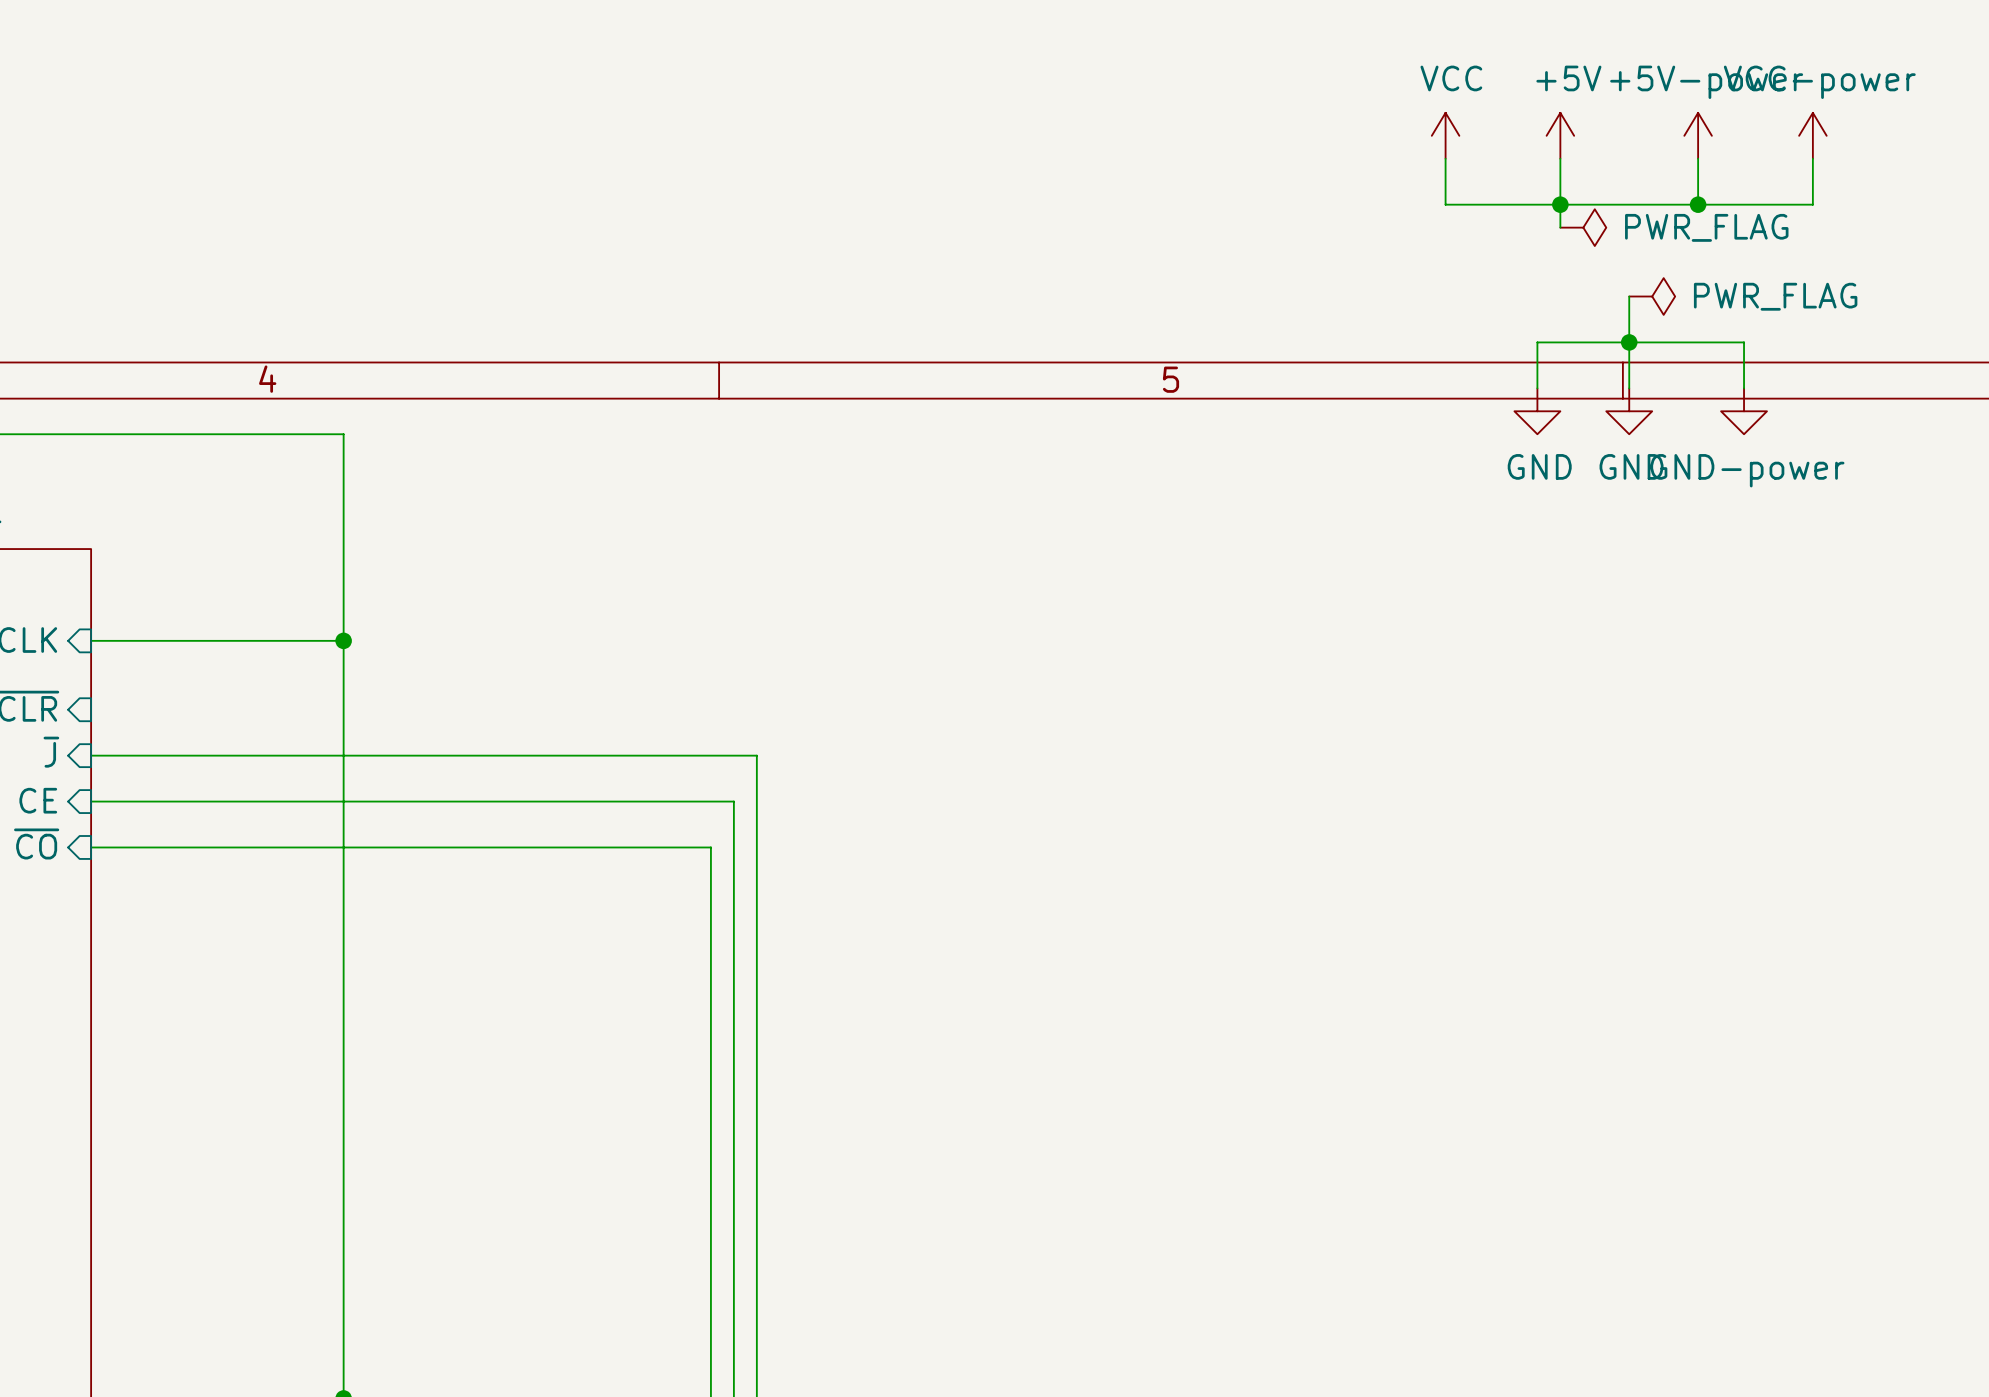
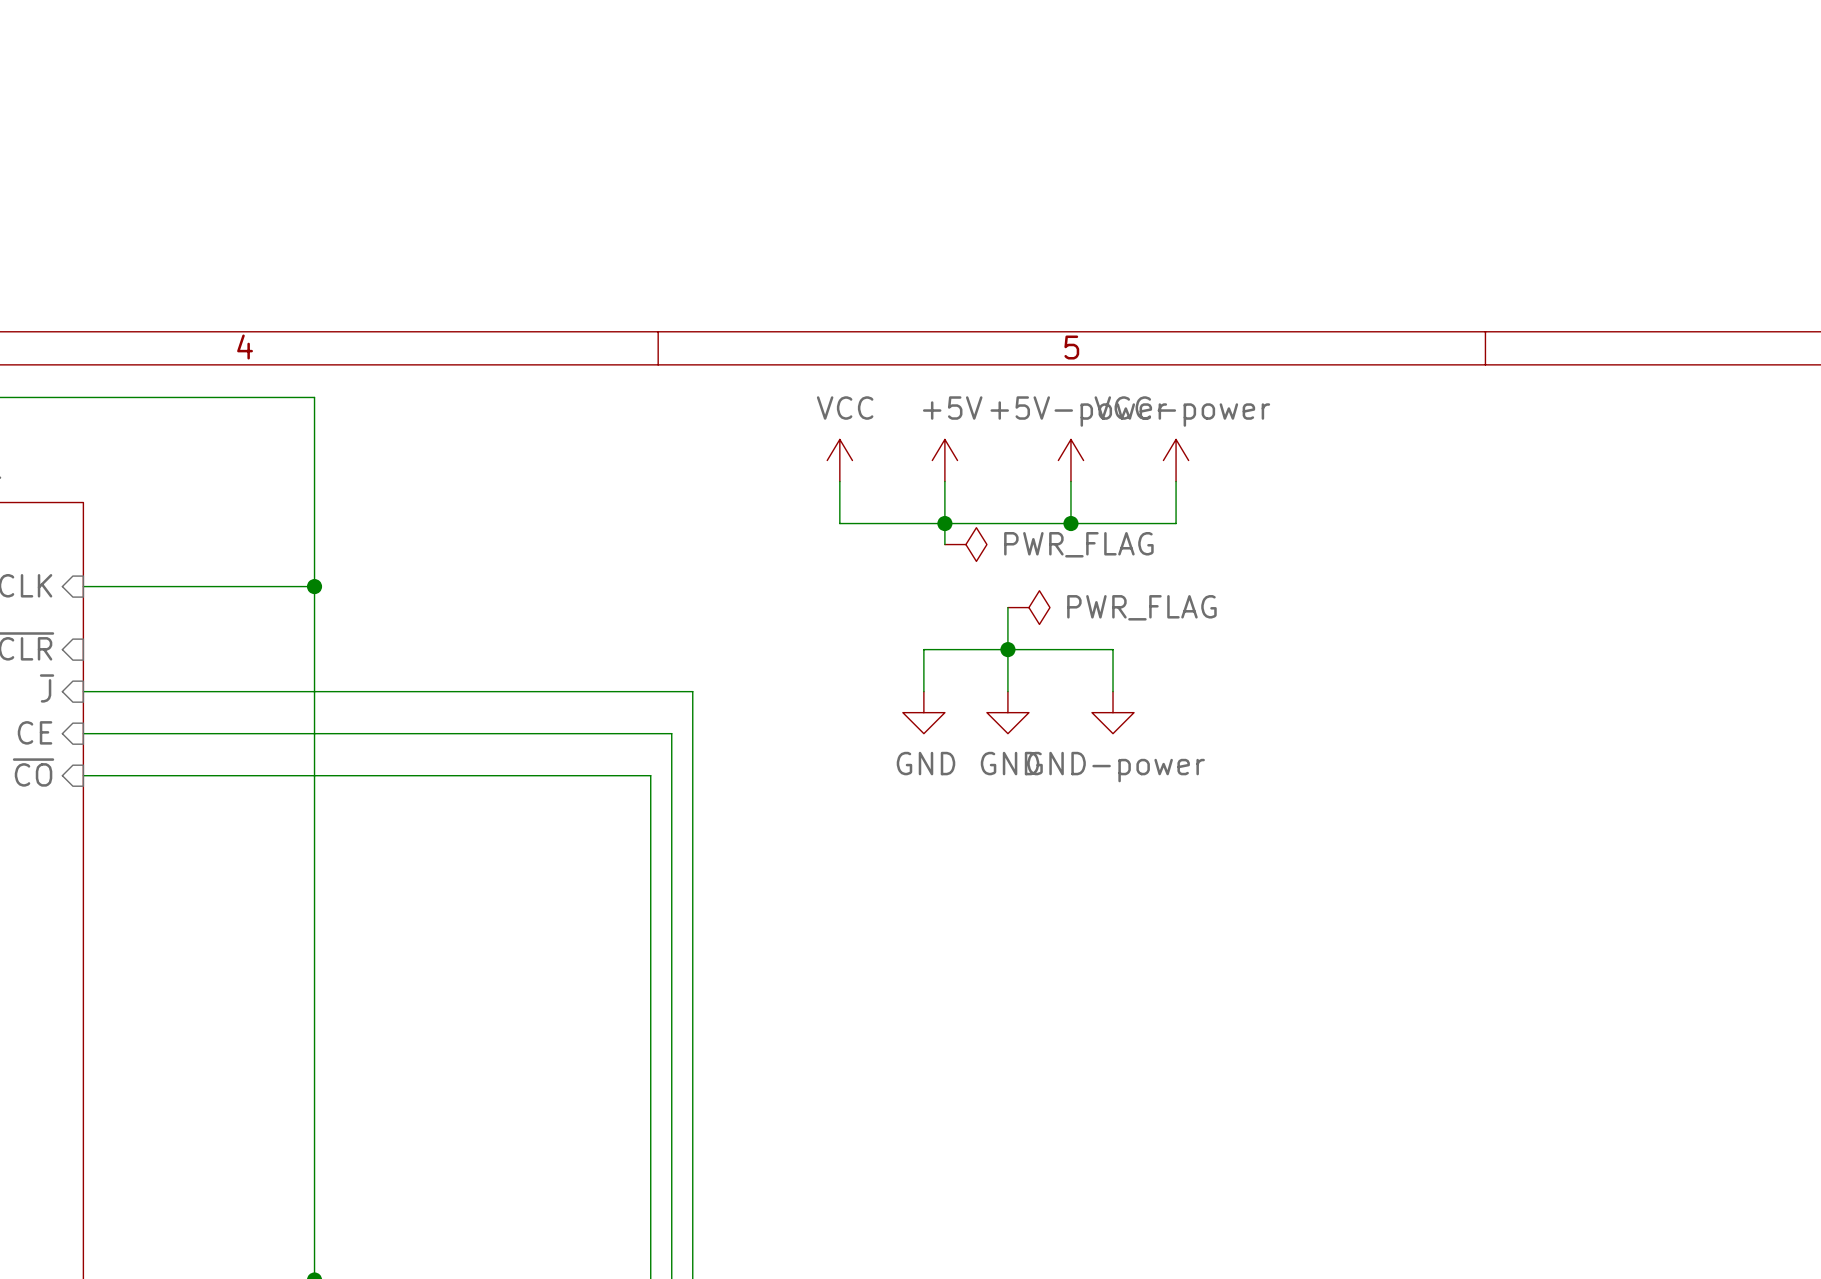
power symbol: VCC (1445, 135) -> none
power symbol: +5V (1560, 135) -> none
power symbol: +5V-power (1698, 135) -> none
power symbol: VCC-power (1812, 135) -> none
wire: (1445, 158) (1445, 204) (1812, 204) (1812, 158) -> none
wire: (1560, 158) (1560, 227) -> none
wire: (1698, 158) (1698, 204) -> none
junction: (1560, 204) -> none
junction: (1698, 204) -> none
power symbol: PWR_FLAG (1583, 227) -> none
wire: (1629, 296) (1629, 388) -> none
power symbol: PWR_FLAG (1652, 296) -> none
junction: (1629, 342) -> none
wire: (1537, 388) (1537, 342) (1744, 342) (1744, 388) -> none
power symbol: GND (1537, 411) -> none
power symbol: GND (1629, 411) -> none
power symbol: GND-power (1744, 411) -> none
power symbol: none -> VCC (839, 460)
power symbol: none -> +5V (944, 460)
power symbol: none -> +5V-power (1070, 460)
power symbol: none -> VCC-power (1176, 460)
wire: none -> (839, 481) (839, 523) (1176, 523) (1176, 481)
wire: none -> (944, 481) (944, 544)
wire: none -> (1070, 481) (1070, 523)
junction: none -> (944, 523)
junction: none -> (1070, 523)
power symbol: none -> PWR_FLAG (965, 544)
wire: none -> (1007, 607) (1007, 691)
power symbol: none -> PWR_FLAG (1028, 607)
junction: none -> (1007, 649)
wire: none -> (923, 691) (923, 649) (1113, 649) (1113, 691)
power symbol: none -> GND (923, 712)
power symbol: none -> GND (1007, 712)
power symbol: none -> GND-power (1113, 712)

